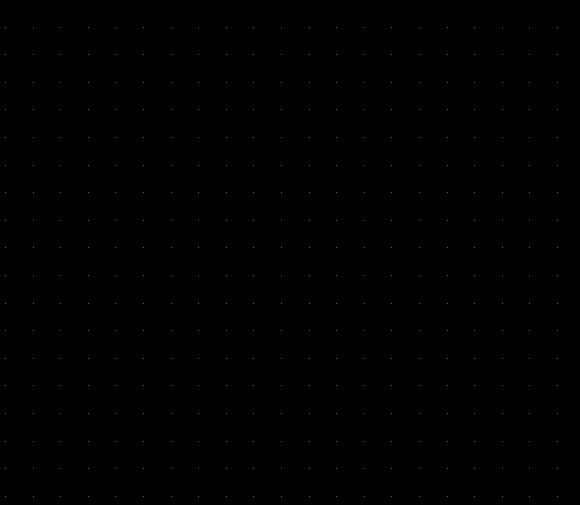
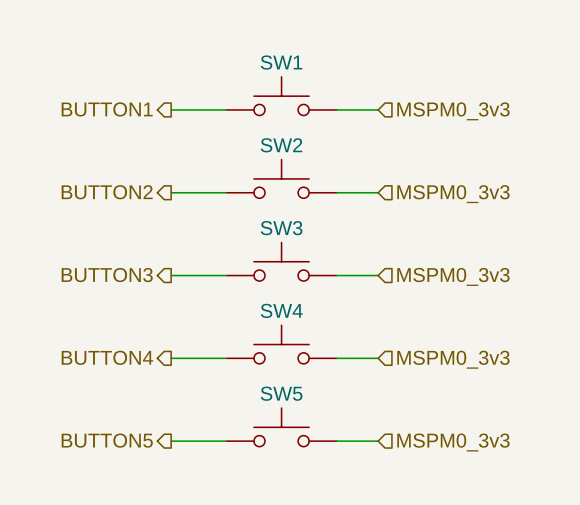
SW1: none -> (281, 96)
hierarchical label: none -> BUTTON1 (107, 109)
wire: none -> (171, 109) (226, 109)
wire: none -> (336, 109) (378, 109)
hierarchical label: none -> MSPM0_3v3 (453, 111)
SW2: none -> (281, 178)
hierarchical label: none -> BUTTON2 (107, 192)
wire: none -> (171, 192) (226, 192)
wire: none -> (336, 192) (378, 192)
hierarchical label: none -> MSPM0_3v3 (453, 194)
SW3: none -> (281, 261)
hierarchical label: none -> BUTTON3 (107, 275)
wire: none -> (171, 275) (226, 275)
wire: none -> (336, 275) (378, 275)
hierarchical label: none -> MSPM0_3v3 (453, 276)
SW4: none -> (281, 344)
hierarchical label: none -> BUTTON4 (107, 357)
wire: none -> (171, 358) (226, 358)
wire: none -> (336, 358) (378, 358)
hierarchical label: none -> MSPM0_3v3 (453, 359)
SW5: none -> (281, 427)
hierarchical label: none -> BUTTON5 (107, 440)
wire: none -> (171, 441) (226, 441)
wire: none -> (336, 441) (378, 441)
hierarchical label: none -> MSPM0_3v3 (453, 442)

